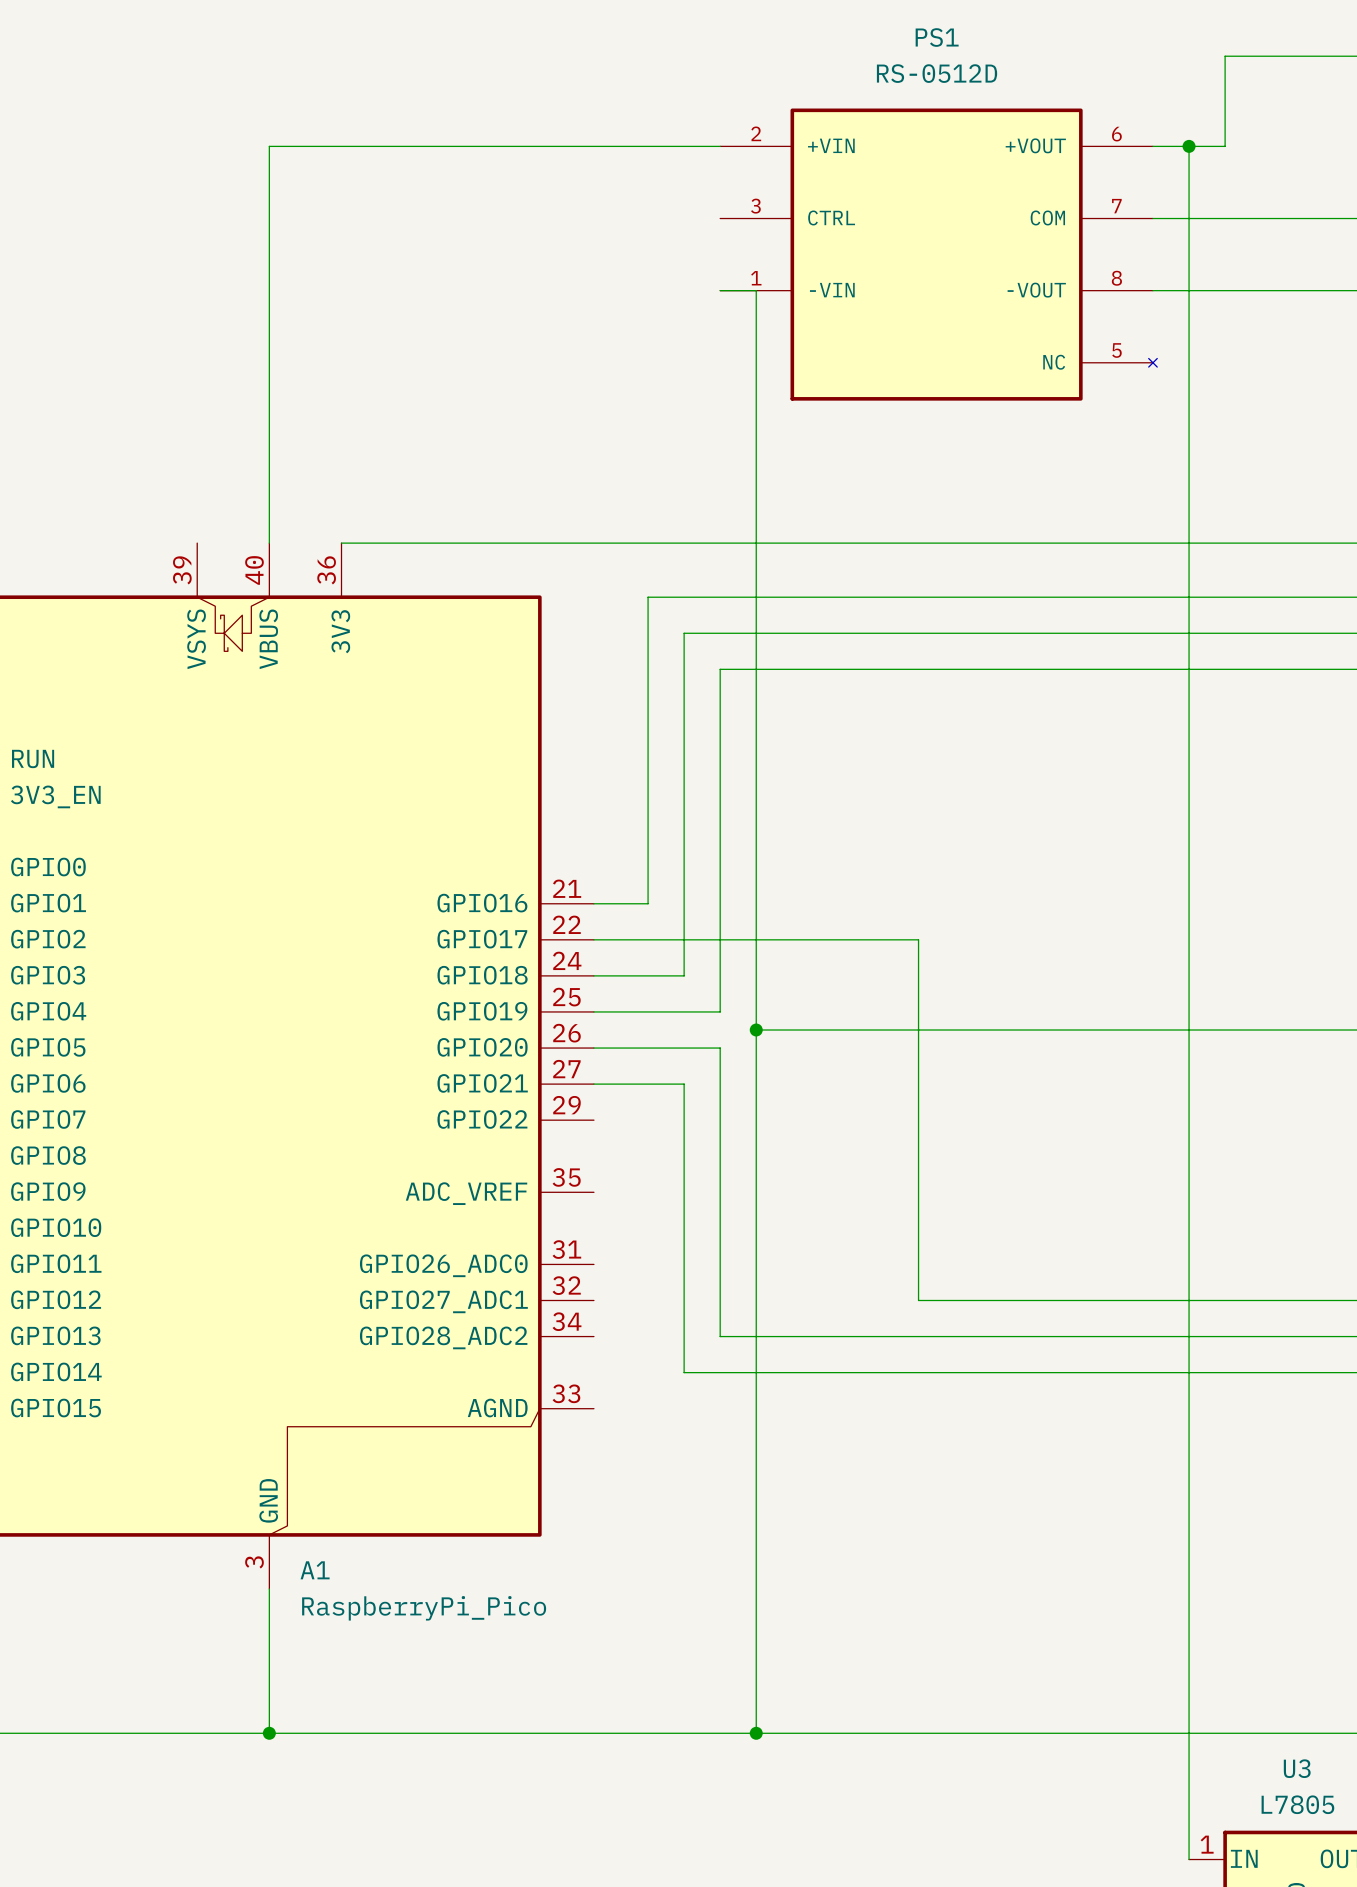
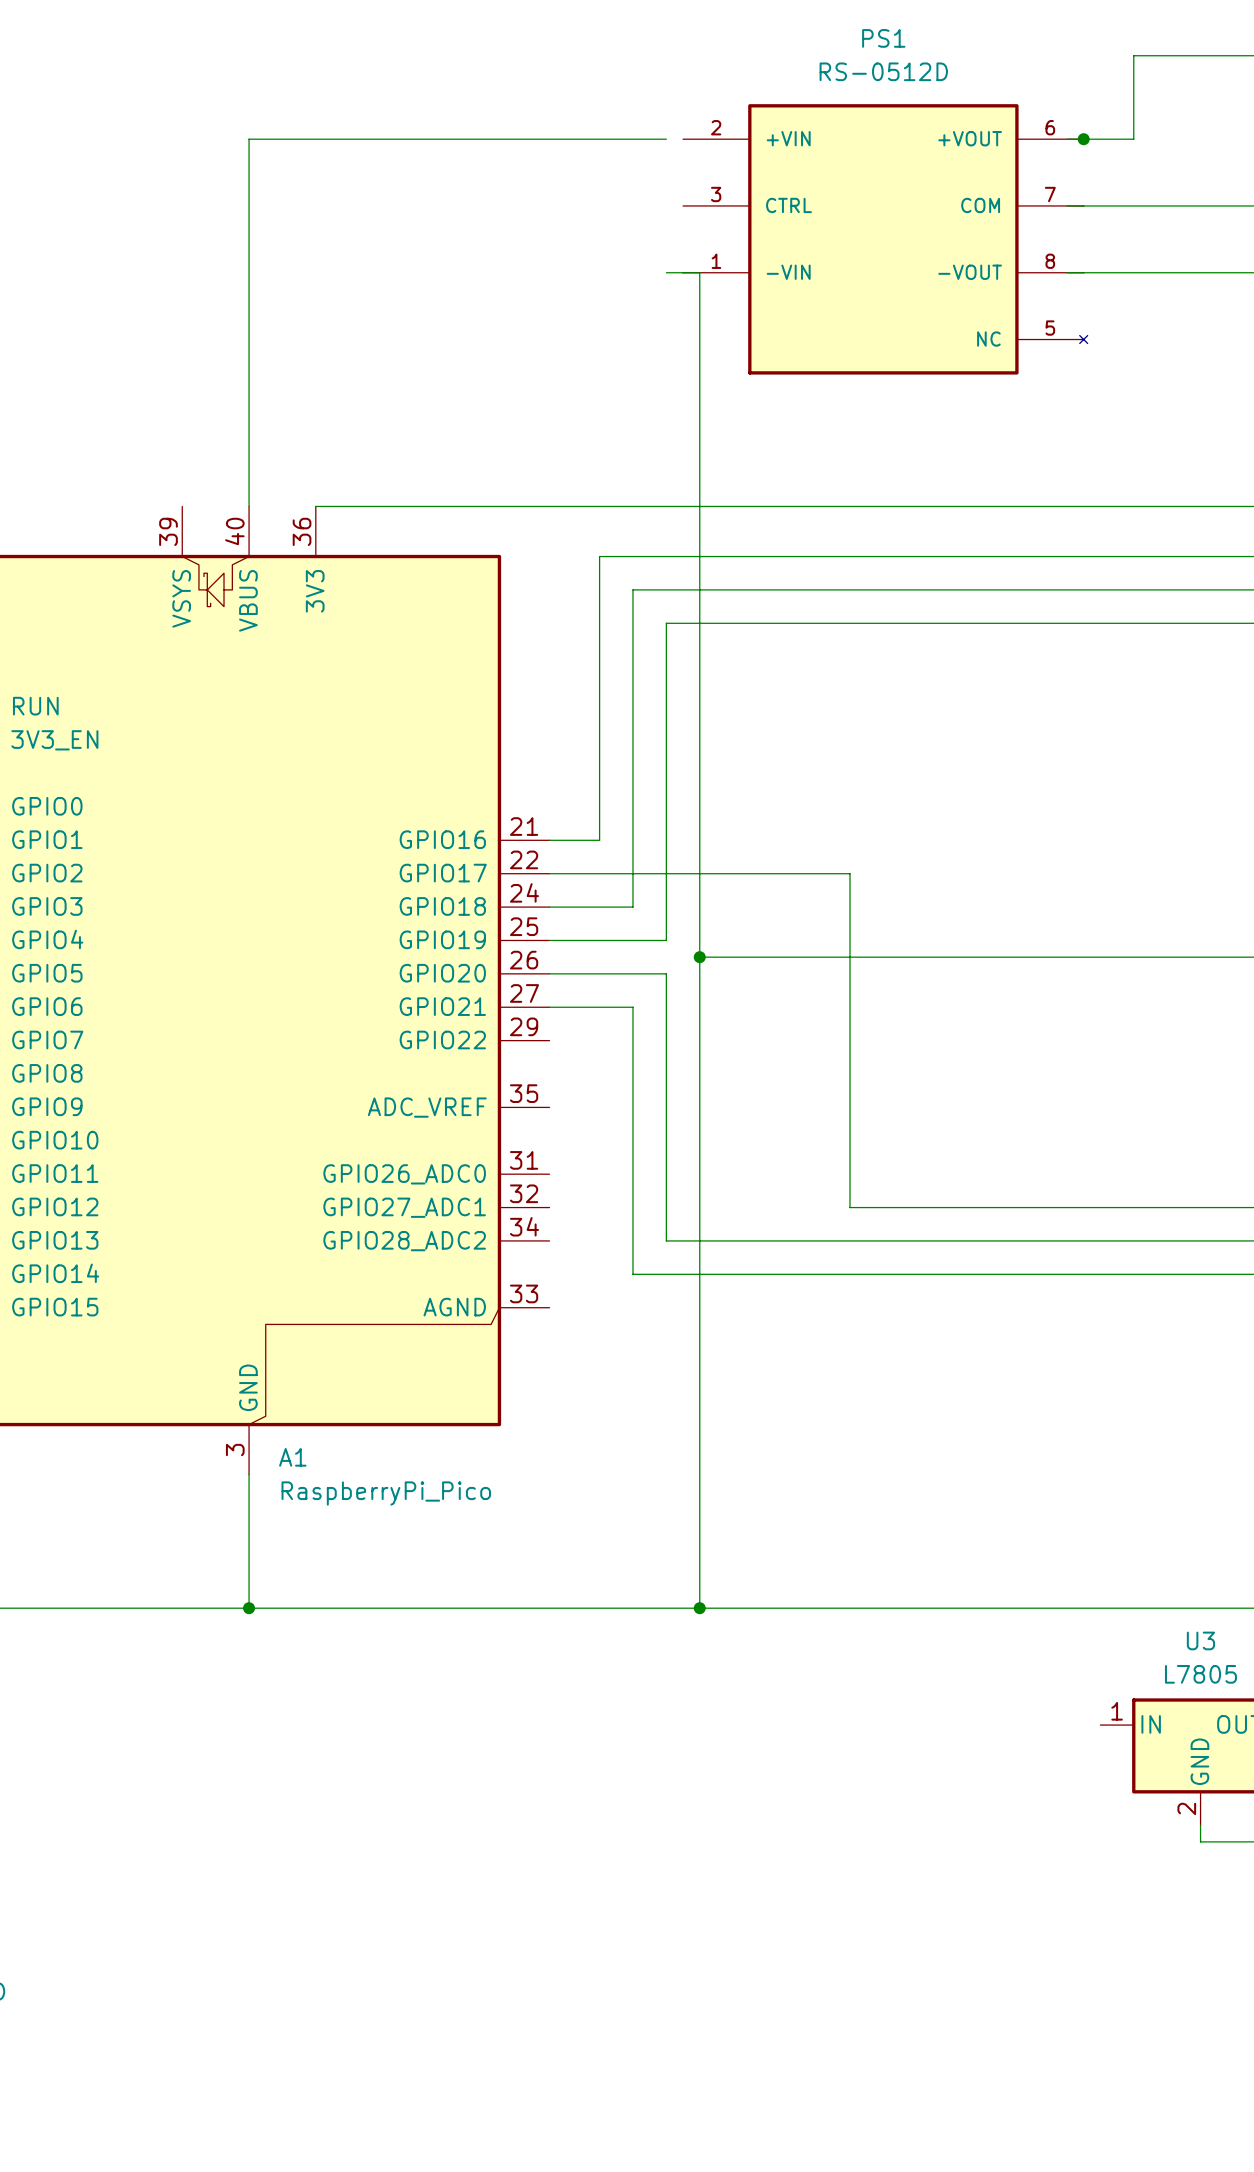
wire: (1189, 146) (1189, 1859) -> none
junction position: (1189, 146) -> (1083, 139)
PS1 position: (938, 254) -> (885, 239)

